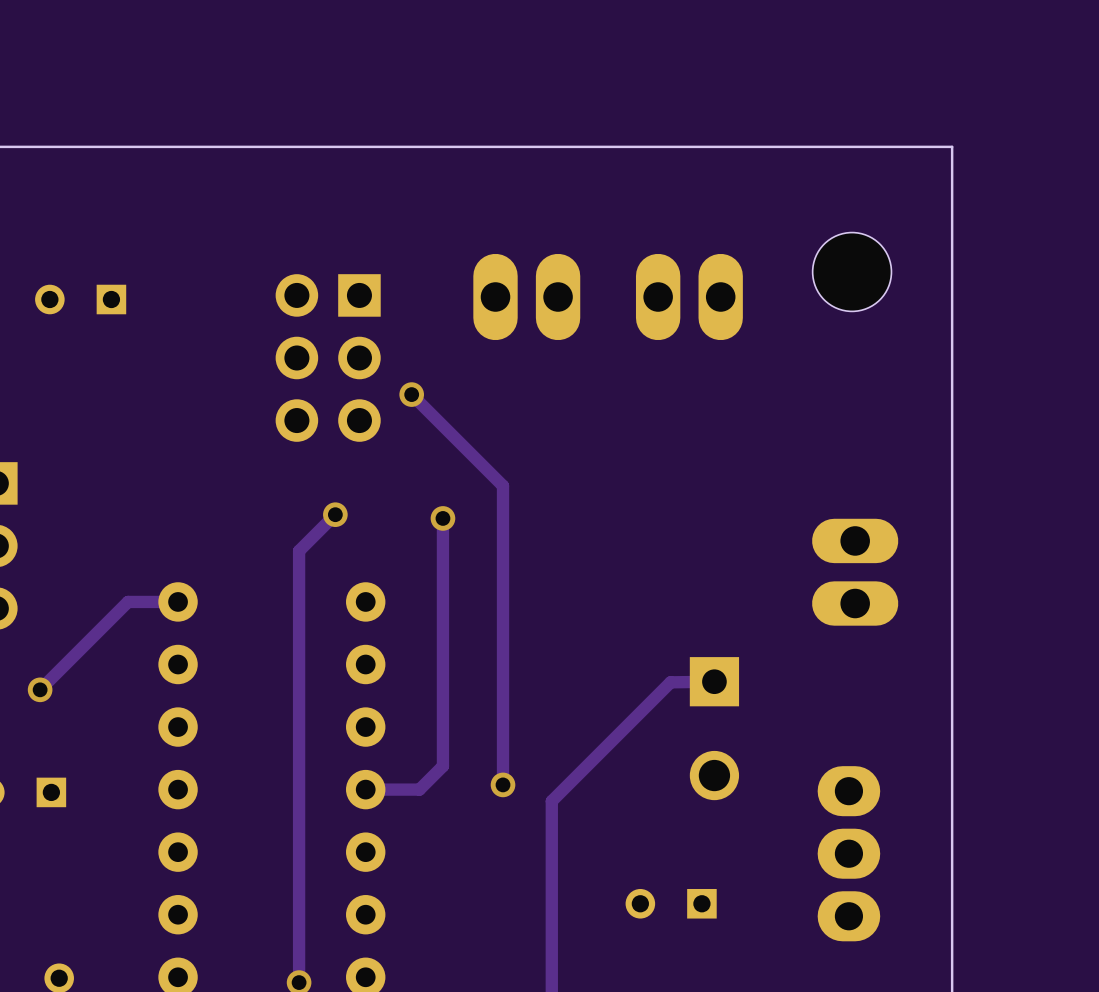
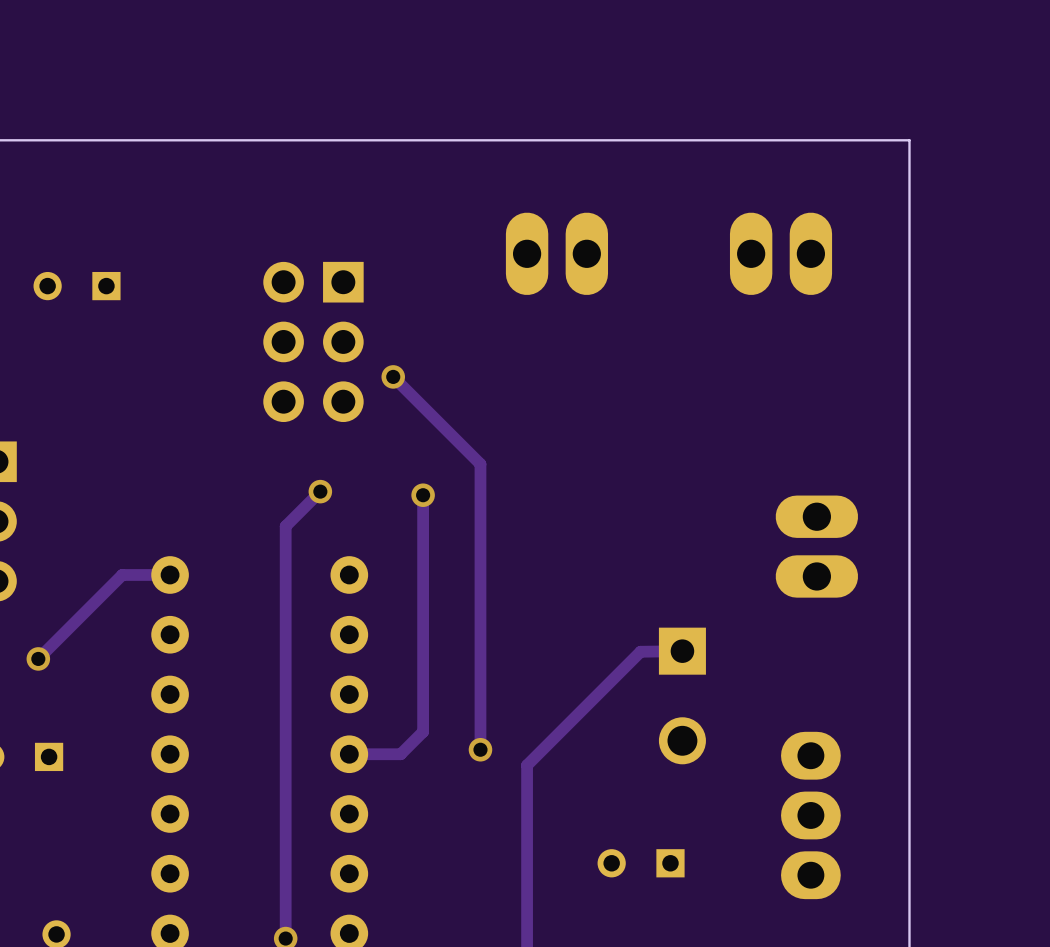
part: none -> (556, 253)
part: none -> (781, 253)
part: (852, 271) -> none
part: (526, 297) -> none
part: (689, 297) -> none

